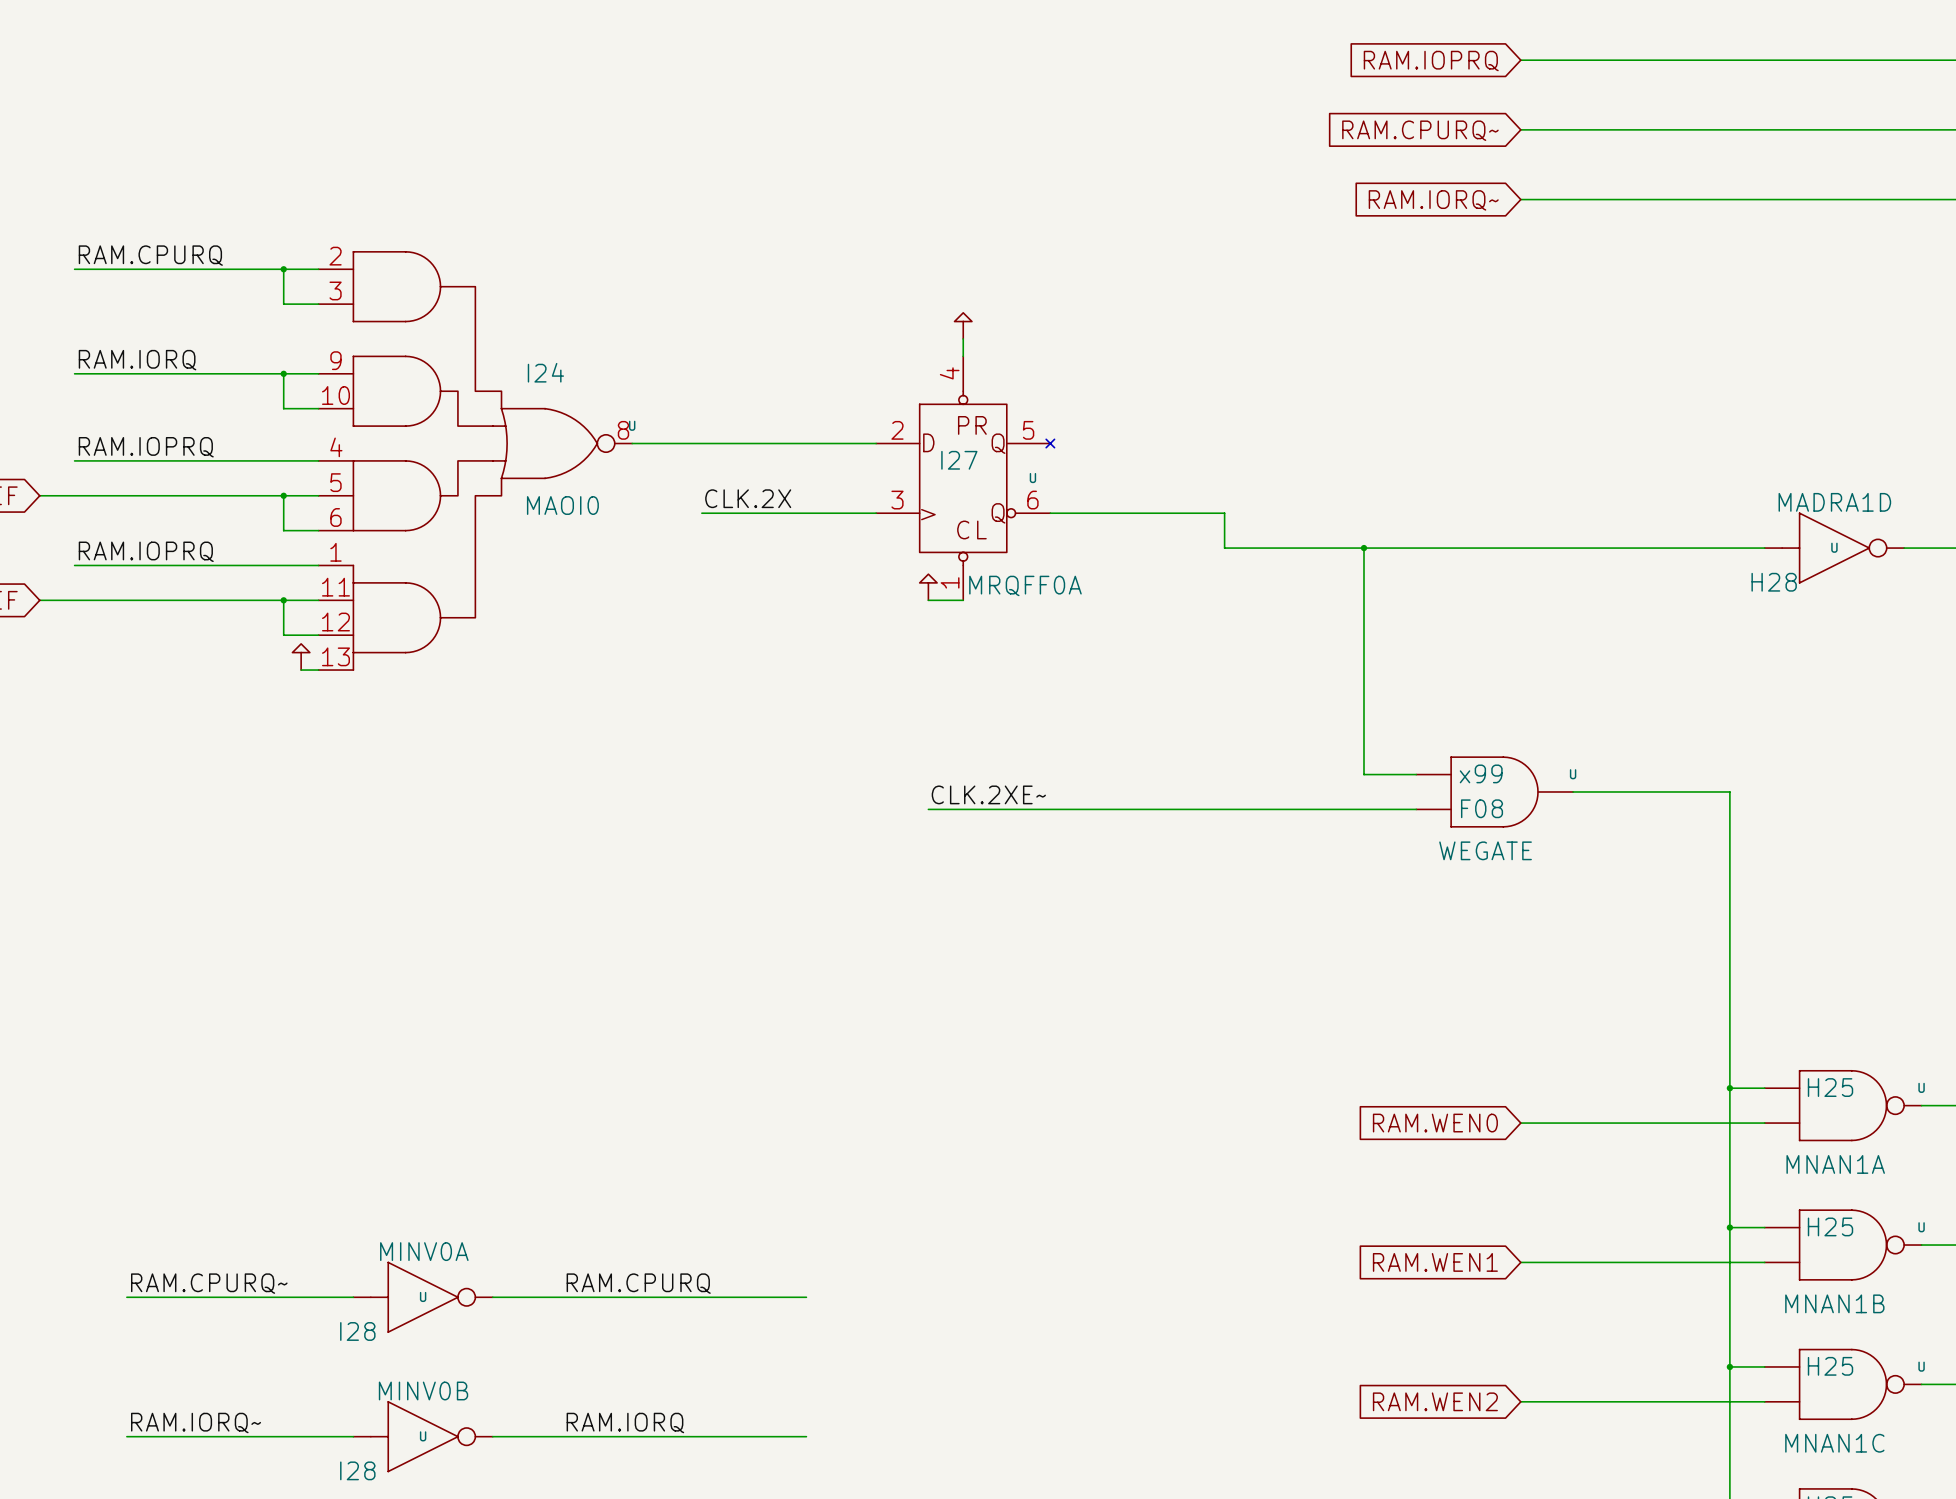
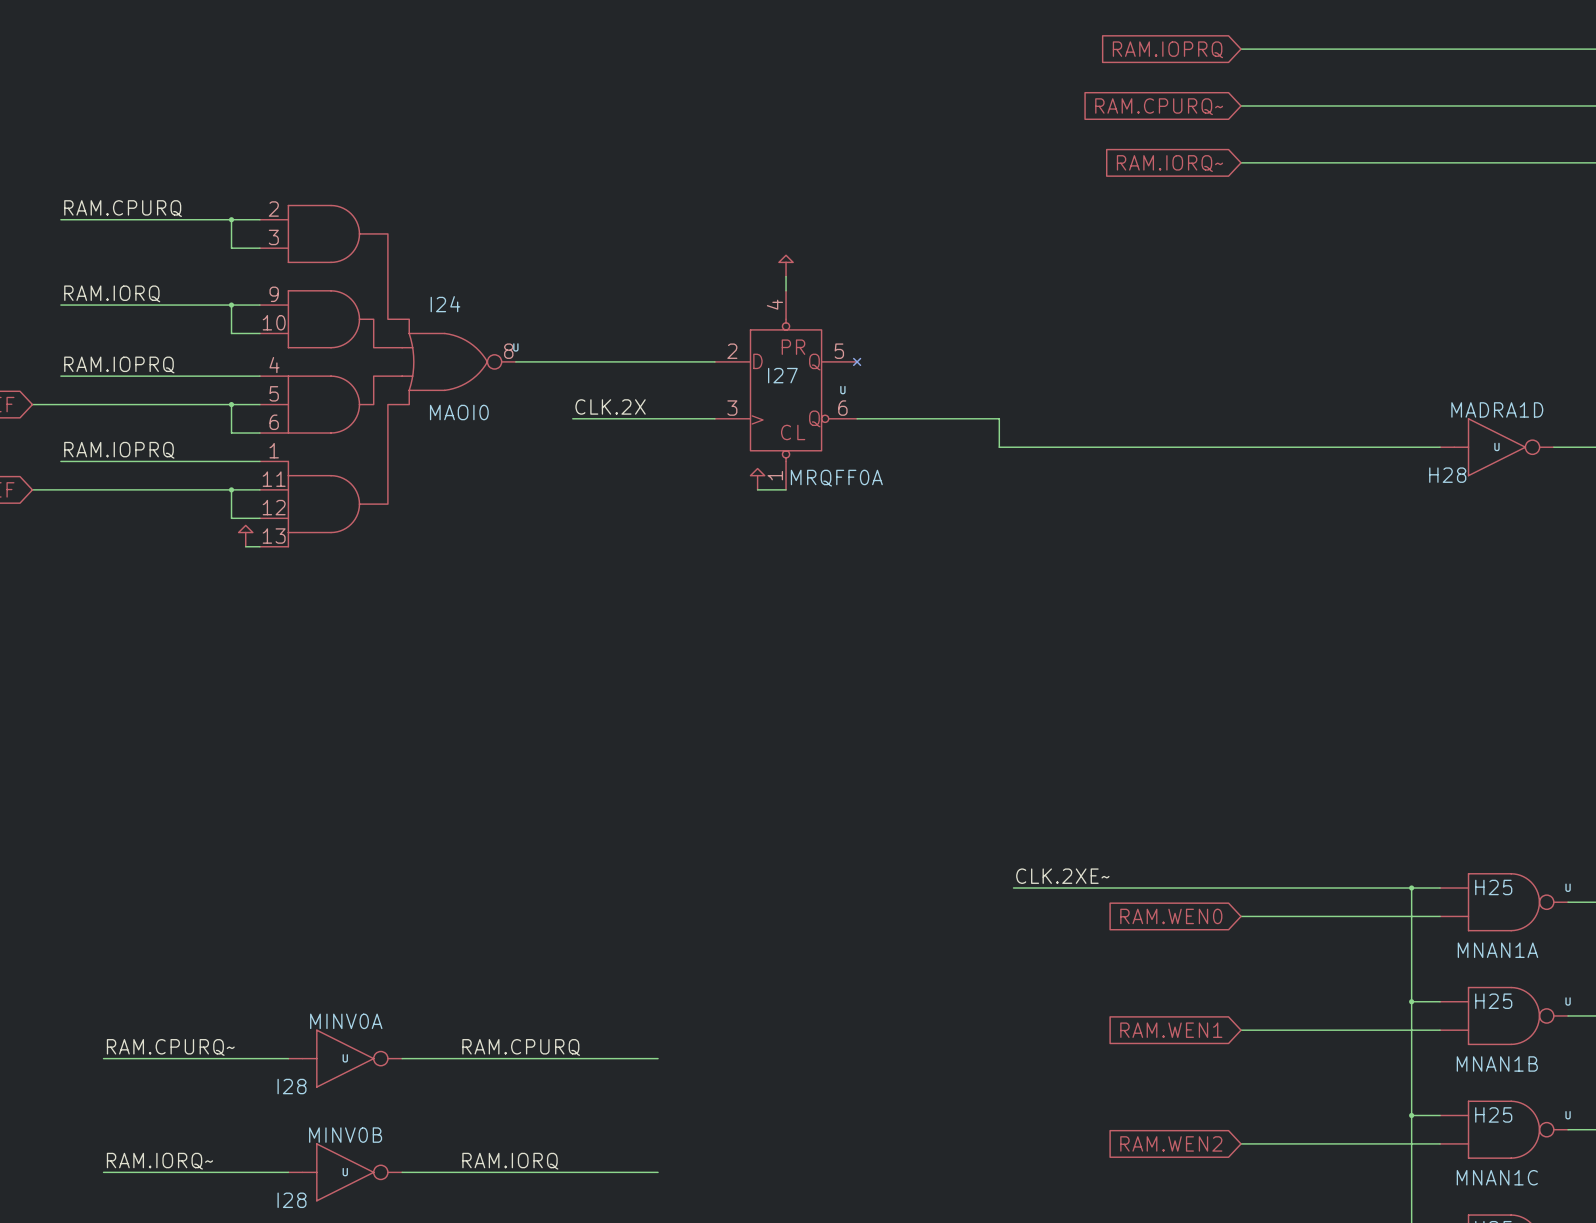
wire: (1363, 548) (1363, 774) (1416, 774) -> none
junction: (1363, 548) -> none
U: F08 (1494, 791) -> none
wire: (1573, 791) (1729, 791) (1729, 1088) -> (1013, 888) (1411, 888)
label: CLK.2XE~ (988, 794) -> none
wire: (928, 809) (1416, 809) -> none
label: none -> CLK.2XE~ (1062, 876)

